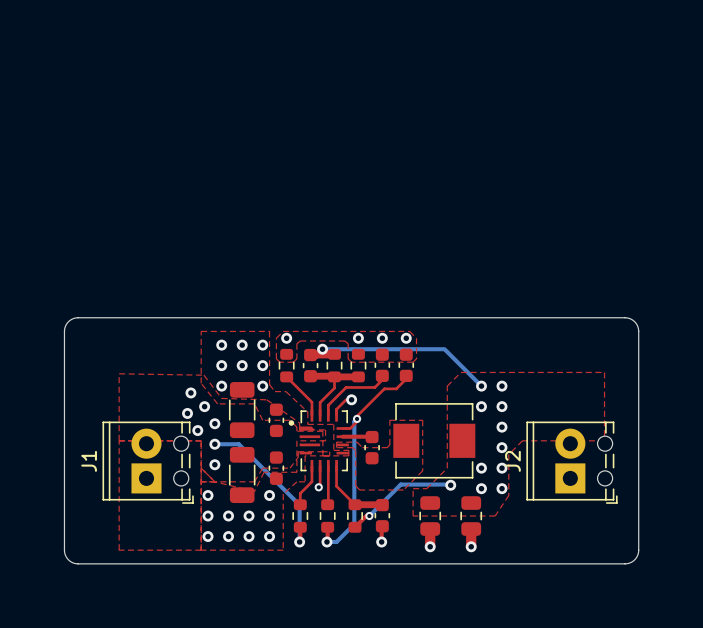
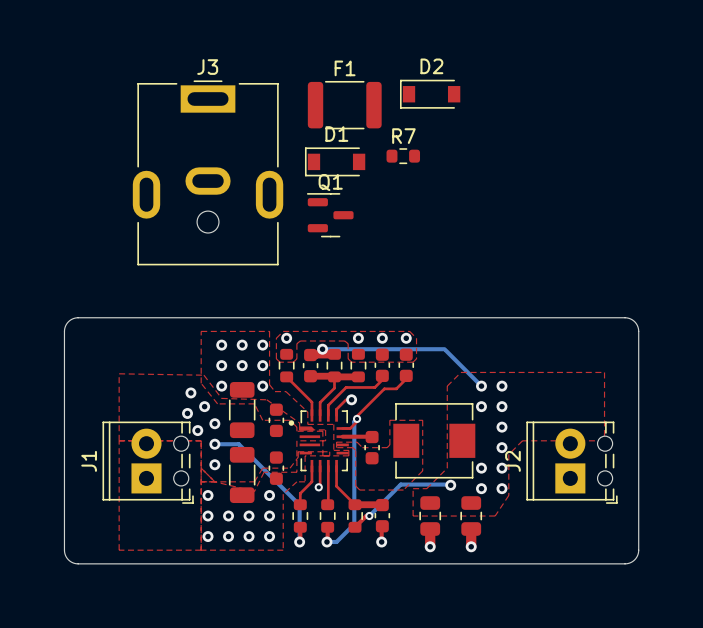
D2: none -> (430, 94)
F1: none -> (344, 105)
R7: none -> (403, 156)
D1: none -> (335, 161)
J3: none -> (208, 172)
Q1: none -> (330, 215)

